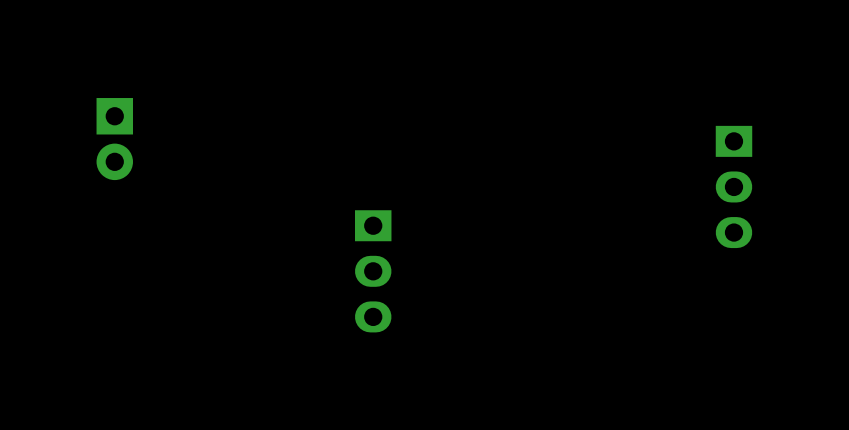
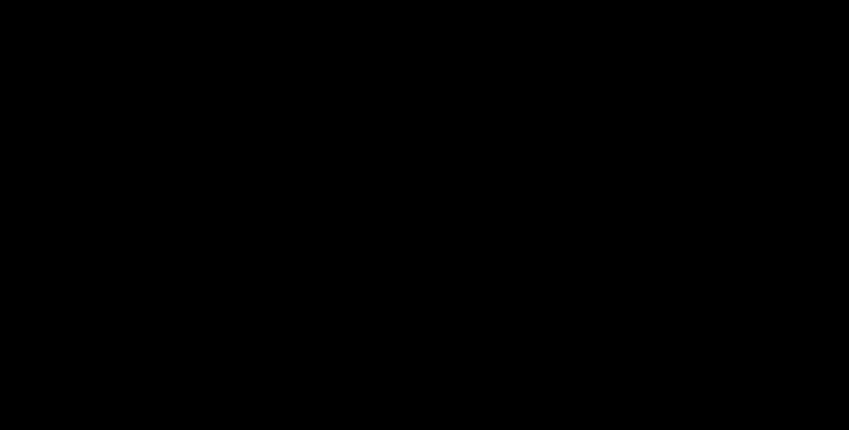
part: (114, 139) -> none
part: (733, 186) -> none
part: (373, 271) -> none

